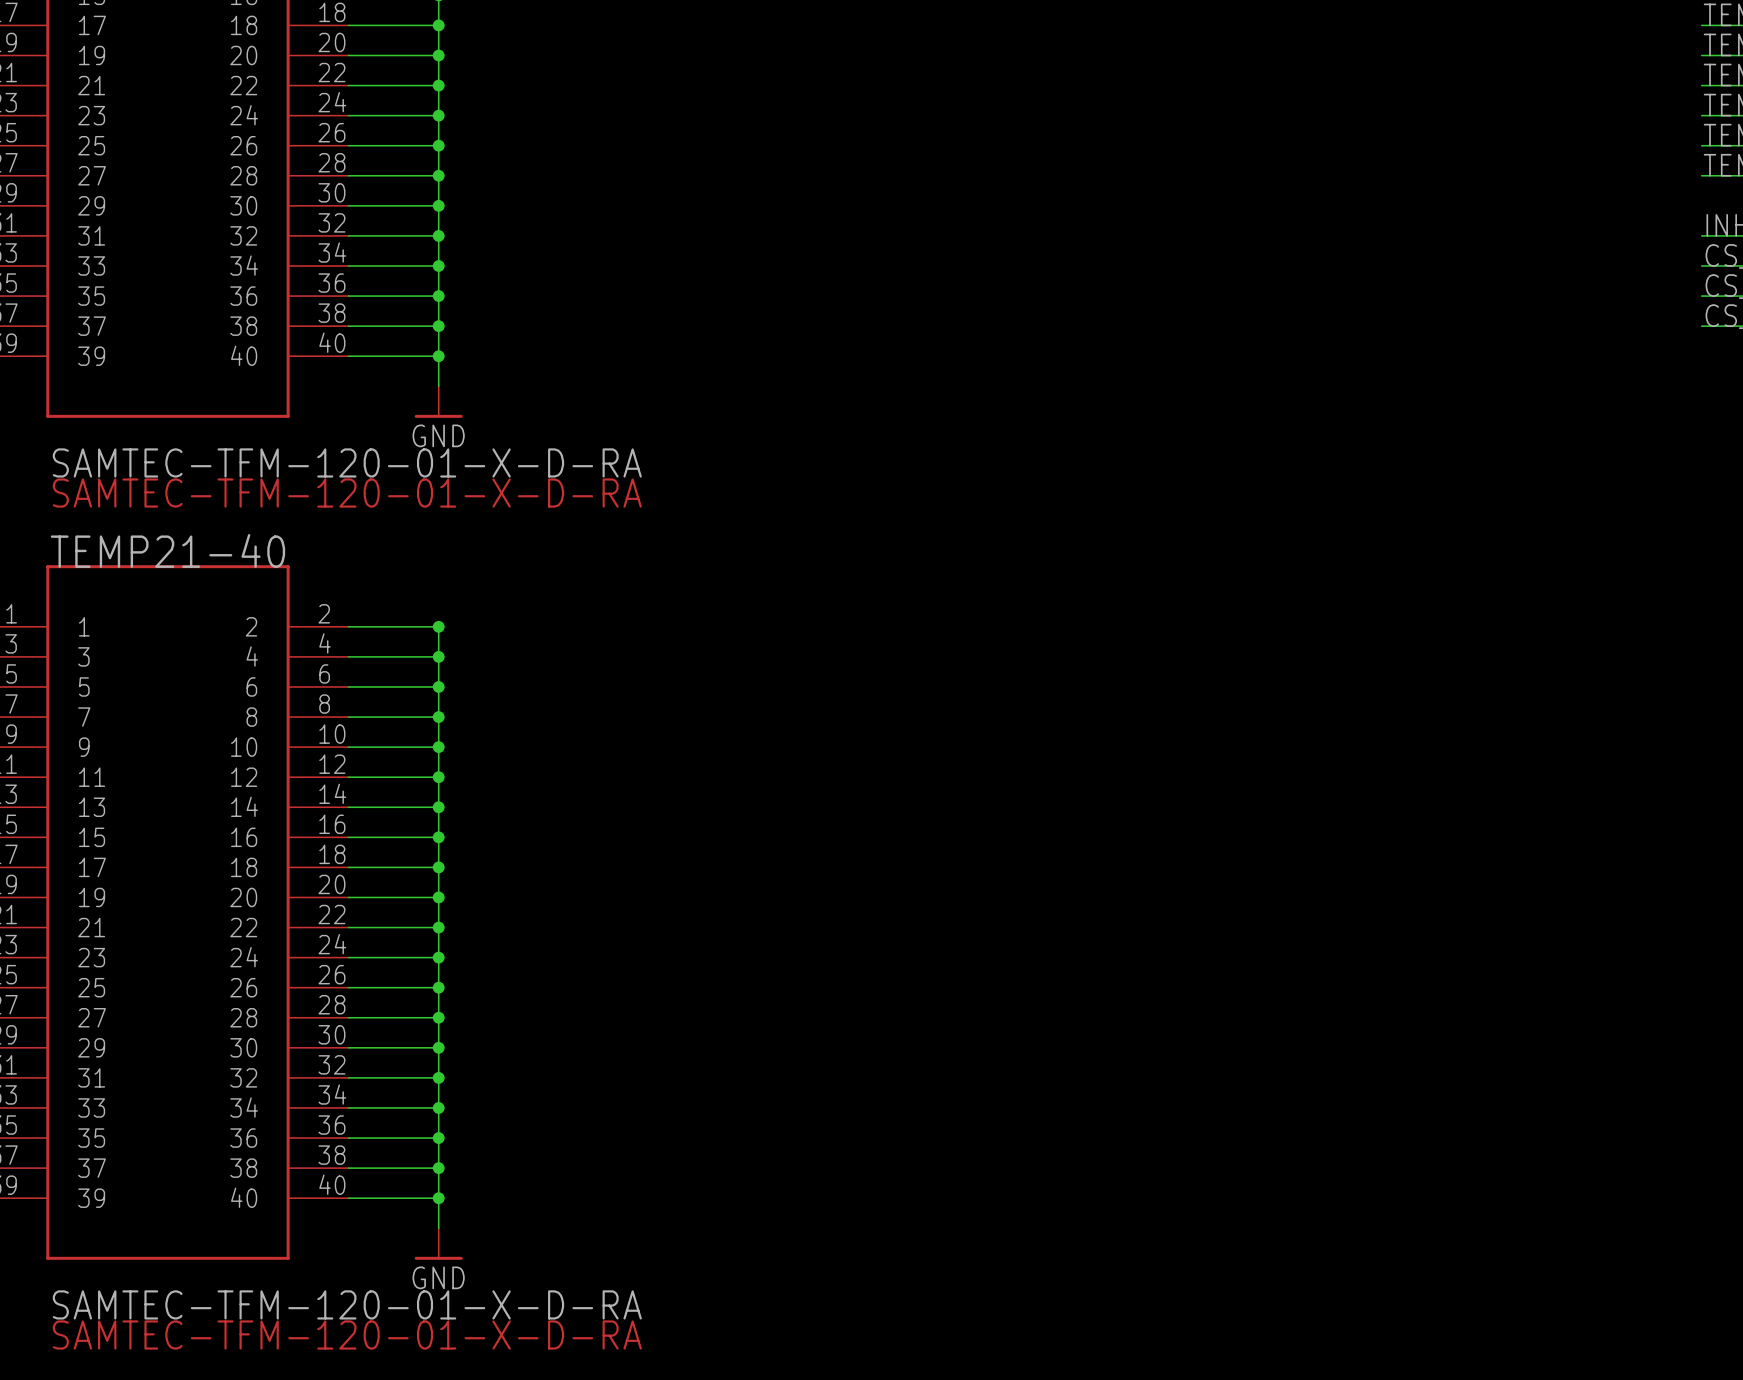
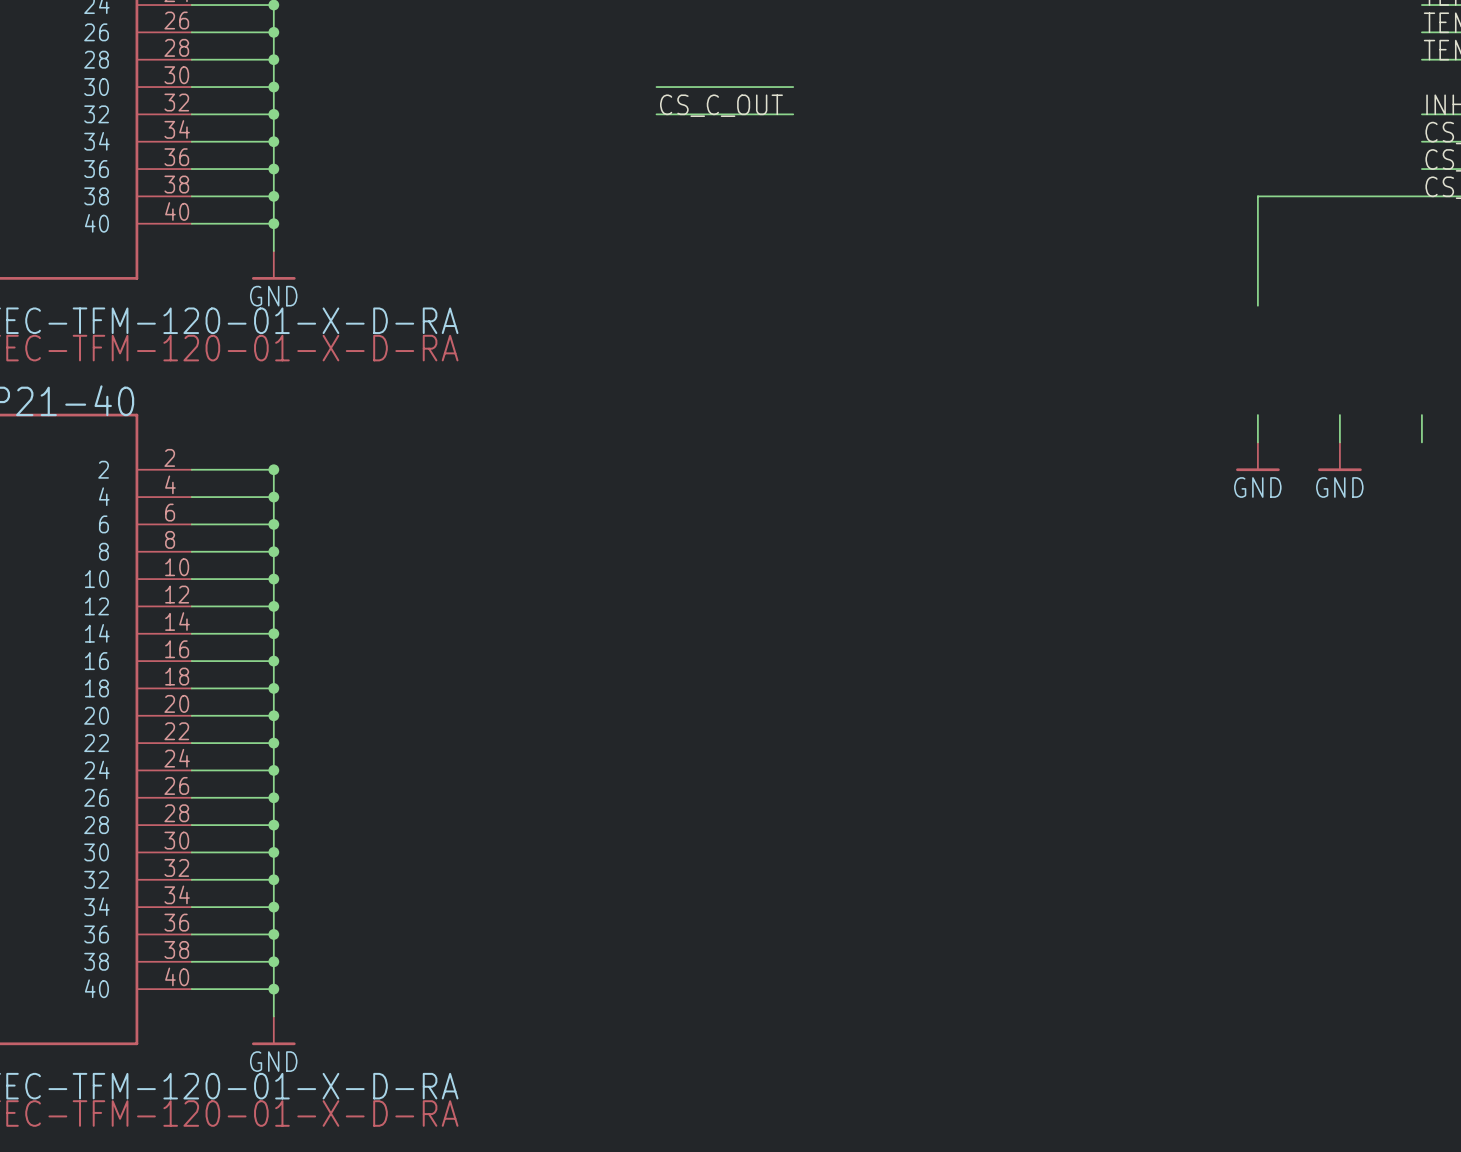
wire: none -> (656, 87) (793, 87)
label: none -> CS_C_OUT (721, 105)
wire: none -> (656, 114) (793, 114)
wire: none -> (1421, 196) (1257, 196) (1257, 305)
wire: none -> (1257, 415) (1257, 442)
wire: none -> (1339, 415) (1339, 442)
wire: none -> (1421, 415) (1421, 442)
power symbol: none -> GND (1257, 456)
power symbol: none -> GND (1339, 456)

